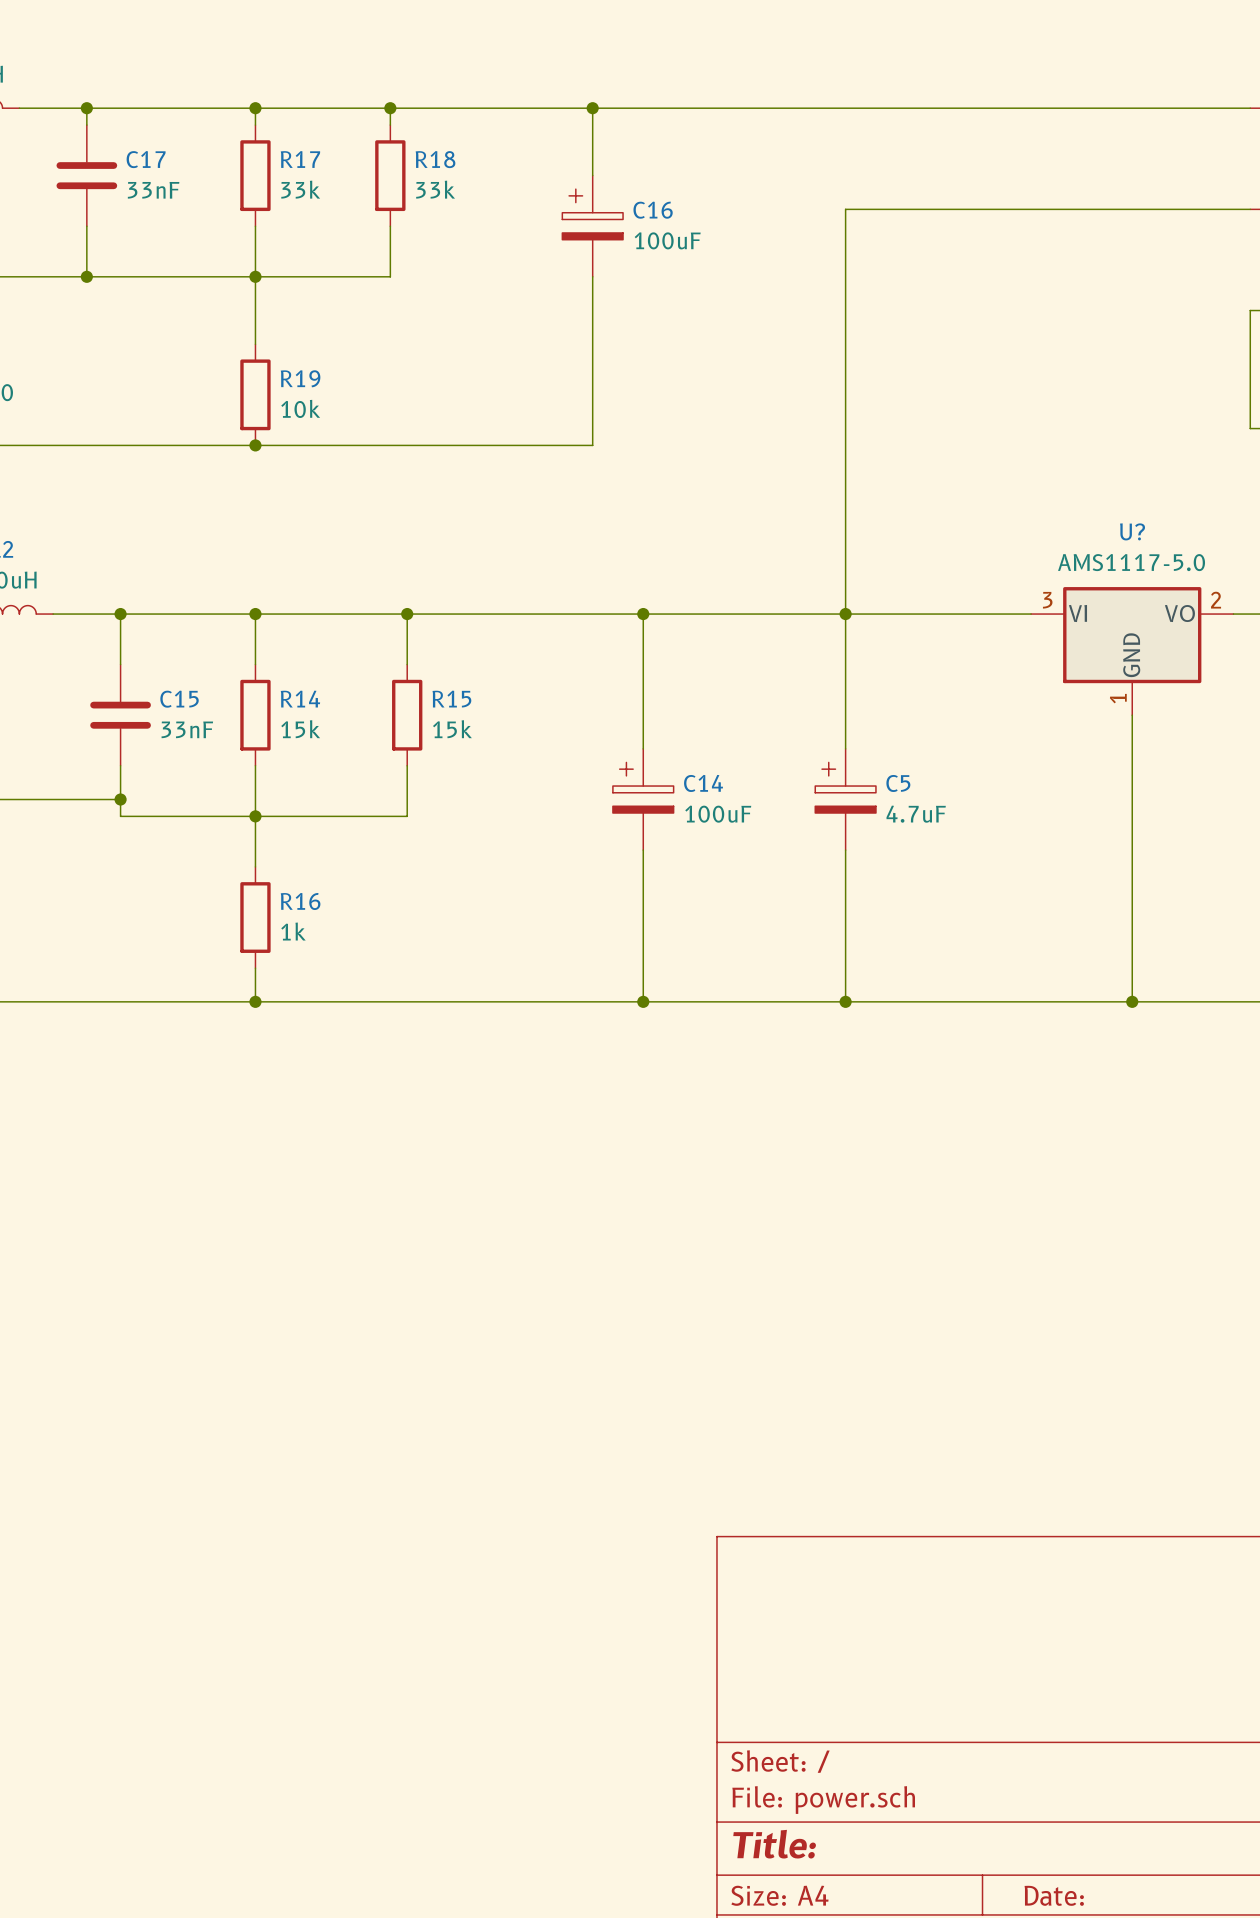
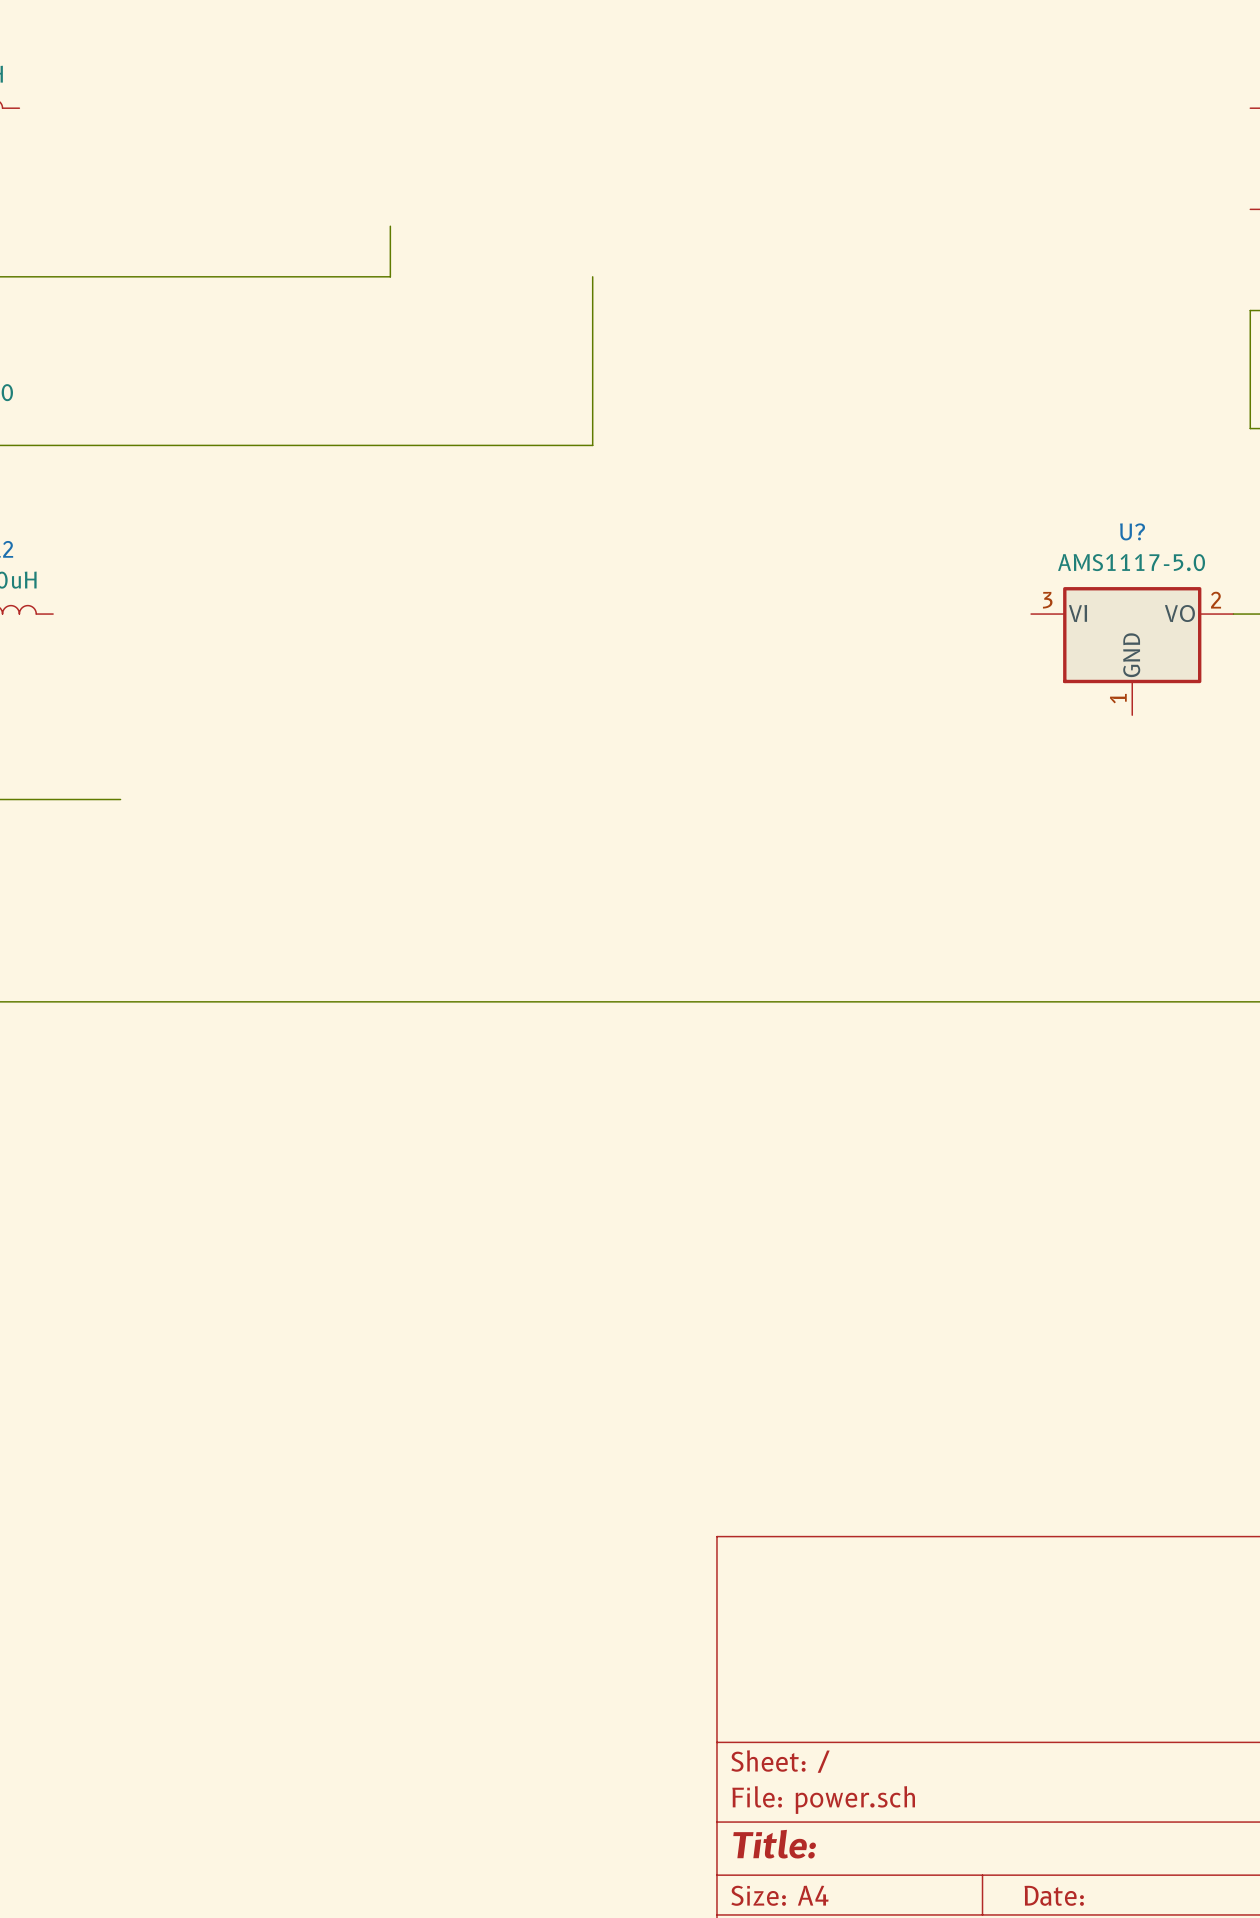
wire: (19, 108) (1250, 108) -> none
wire: (86, 108) (86, 125) -> none
junction: (86, 108) -> none
wire: (255, 108) (255, 125) -> none
junction: (255, 108) -> none
wire: (390, 108) (390, 125) -> none
junction: (390, 108) -> none
wire: (592, 108) (592, 175) -> none
junction: (592, 108) -> none
C17: 33nF (86, 175) -> none
R17: 33k (255, 175) -> none
R18: 33k (390, 175) -> none
wire: (1250, 209) (845, 209) (845, 748) -> none
wire: (86, 226) (86, 276) -> none
wire: (255, 226) (255, 344) -> none
C16: 100uF (592, 226) -> none
junction: (86, 276) -> none
junction: (255, 276) -> none
R19: 10k (255, 394) -> none
junction: (255, 445) -> none
wire: (53, 614) (1031, 614) -> none
wire: (120, 614) (120, 664) -> none
junction: (120, 614) -> none
wire: (255, 614) (255, 664) -> none
junction: (255, 614) -> none
wire: (407, 614) (407, 664) -> none
junction: (407, 614) -> none
wire: (643, 614) (643, 748) -> none
junction: (643, 614) -> none
junction: (845, 614) -> none
C15: 33nF (120, 715) -> none
R14: 15k (255, 715) -> none
R15: 15k (407, 715) -> none
wire: (1132, 715) (1132, 1001) -> none
wire: (120, 765) (120, 816) (407, 816) (407, 765) -> none
wire: (255, 765) (255, 866) -> none
junction: (120, 799) -> none
C14: 100uF (643, 799) -> none
C5: 4.7uF (845, 799) -> none
junction: (255, 816) -> none
wire: (643, 850) (643, 1001) -> none
wire: (845, 850) (845, 1001) -> none
R16: 1k (255, 917) -> none
wire: (255, 968) (255, 1001) -> none
junction: (255, 1001) -> none
junction: (643, 1001) -> none
junction: (845, 1001) -> none
junction: (1132, 1001) -> none

